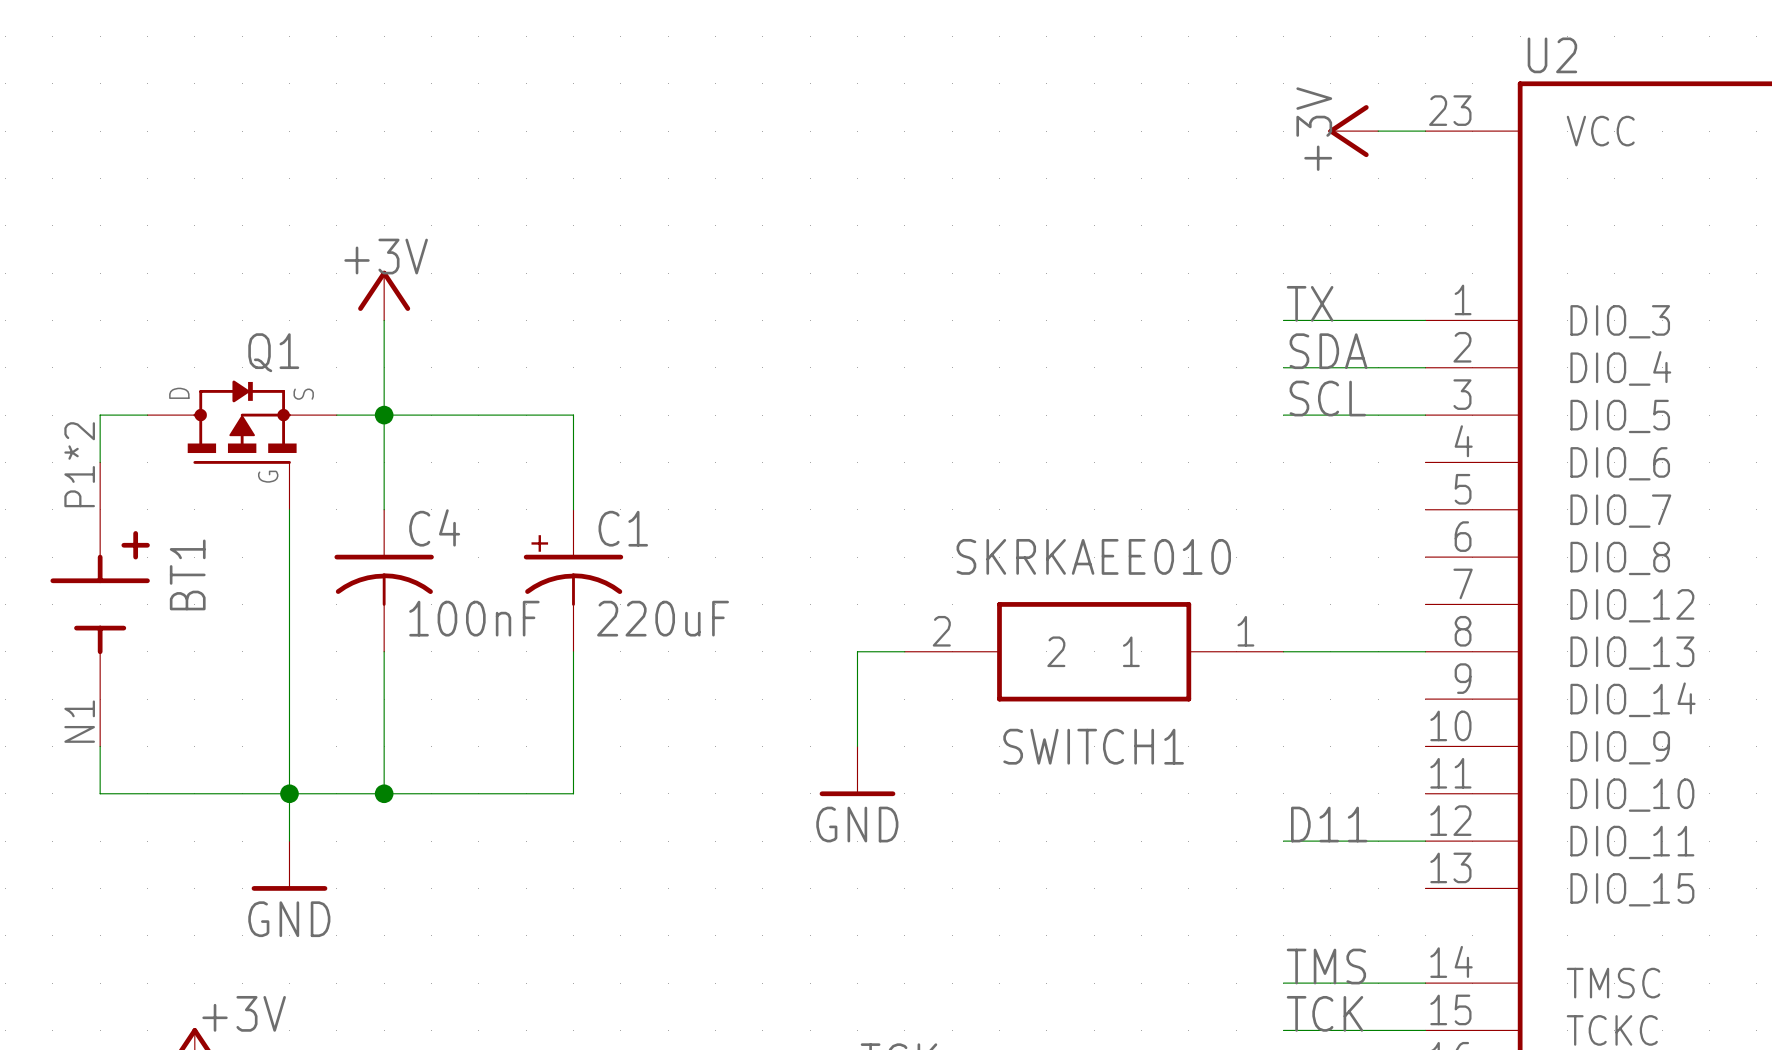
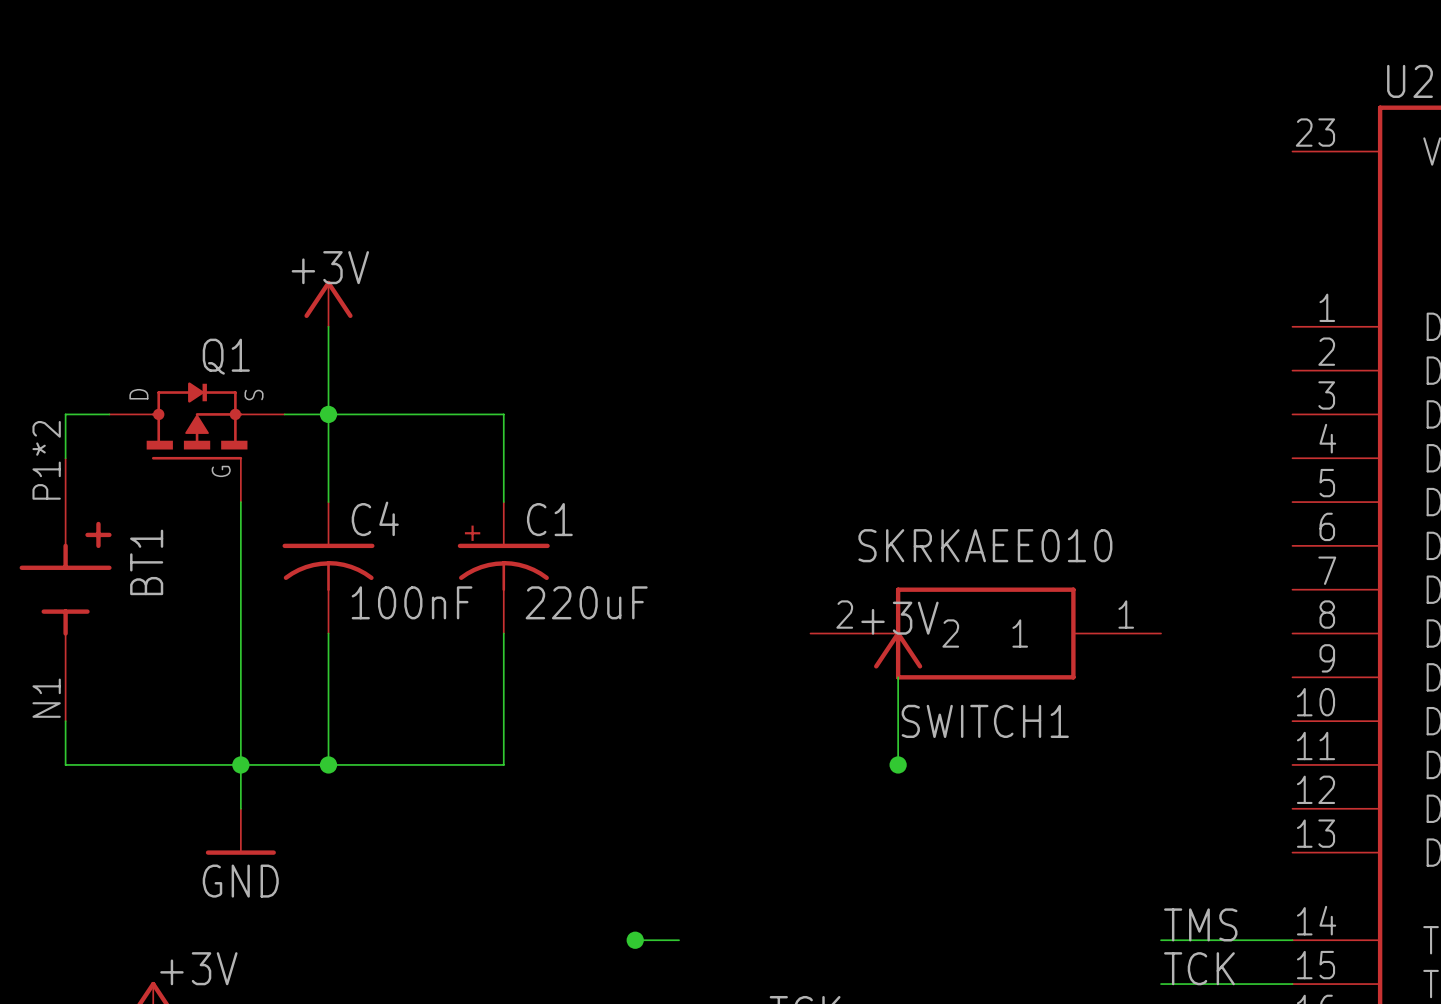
power symbol: +3V (1353, 131) -> none
wire: (1378, 131) (1425, 131) -> none
label: TX (1310, 303) -> none
wire: (1283, 320) (1425, 320) -> none
label: SDA (1328, 351) -> none
wire: (1283, 367) (1425, 367) -> none
label: SCL (1327, 398) -> none
wire: (1283, 415) (1425, 415) -> none
wire: (904, 651) (857, 651) (857, 746) -> none
wire: (1283, 651) (1425, 651) -> none
power symbol: none -> +3V (898, 654)
wire: none -> (898, 677) (898, 764)
power symbol: GND (857, 771) -> none
junction: none -> (898, 764)
label: D11 (1329, 824) -> none
wire: (1283, 841) (1425, 841) -> none
wire: none -> (635, 940) (679, 940)
junction: none -> (635, 940)

